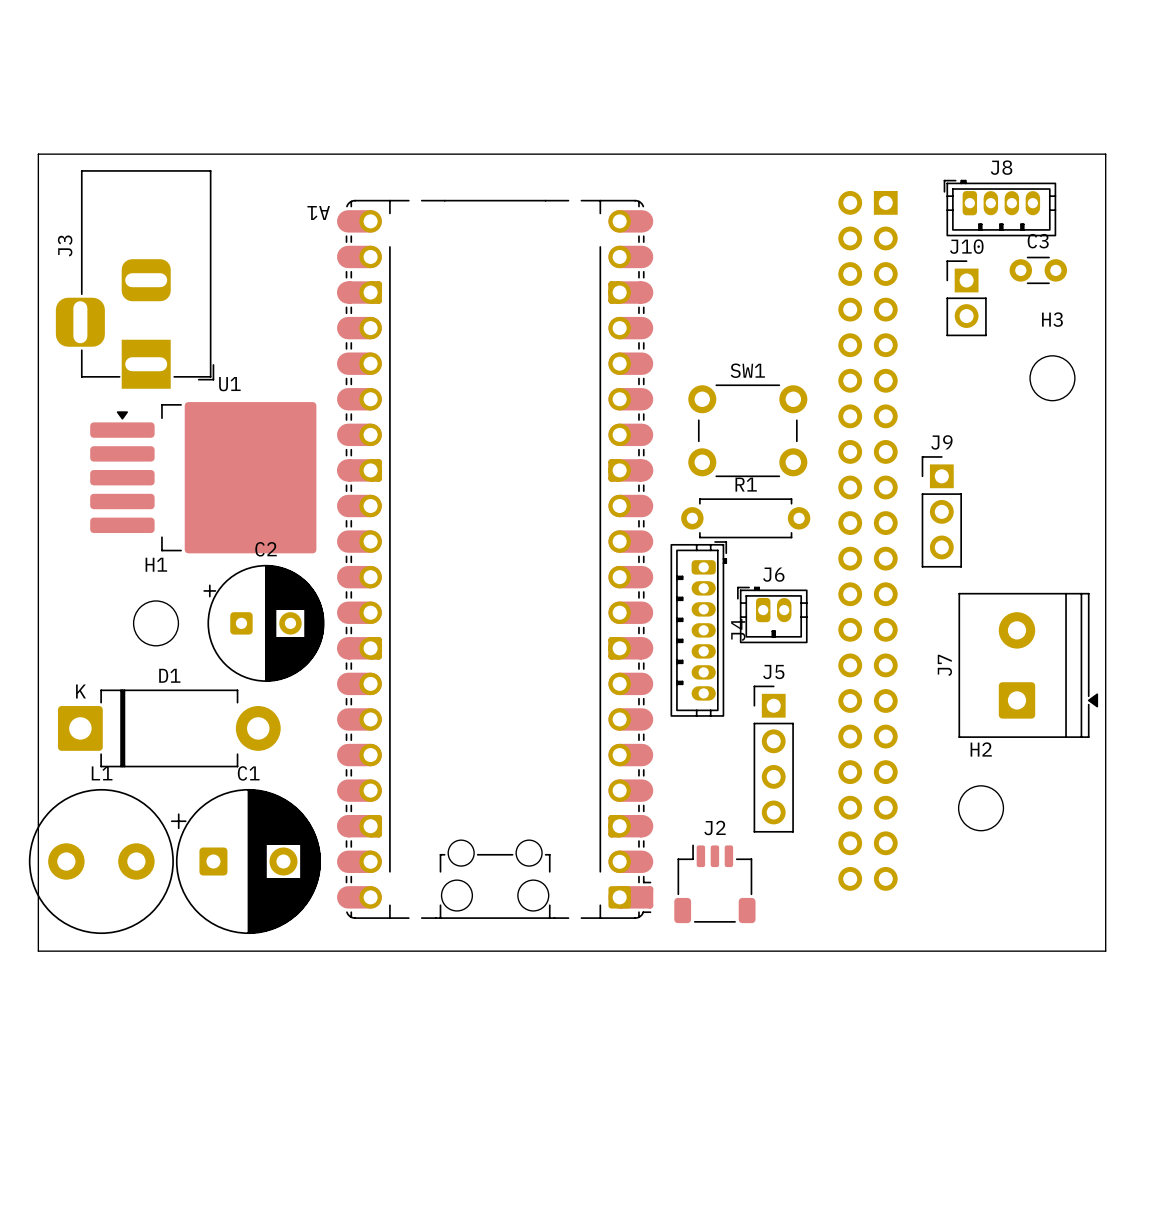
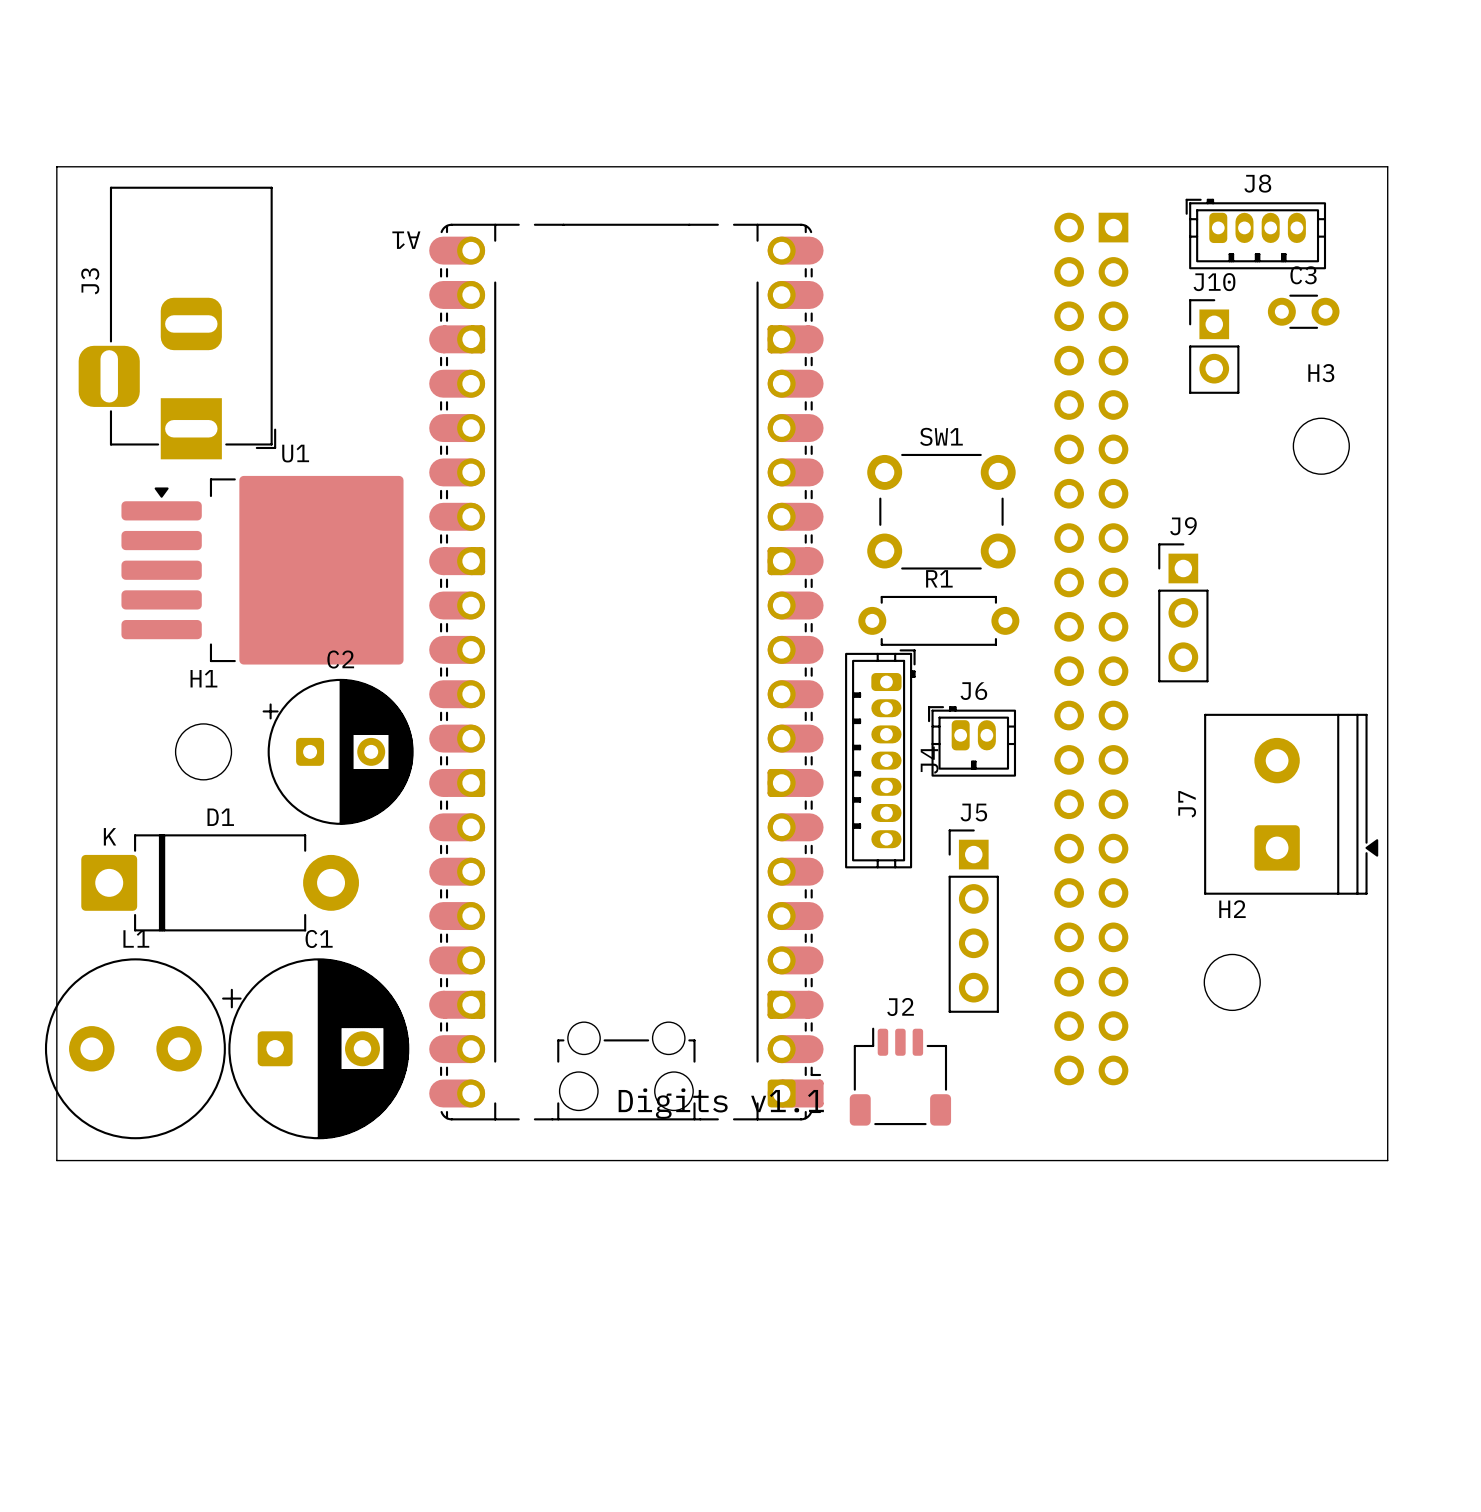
text: none -> Digits v1.1 (721, 1103)

